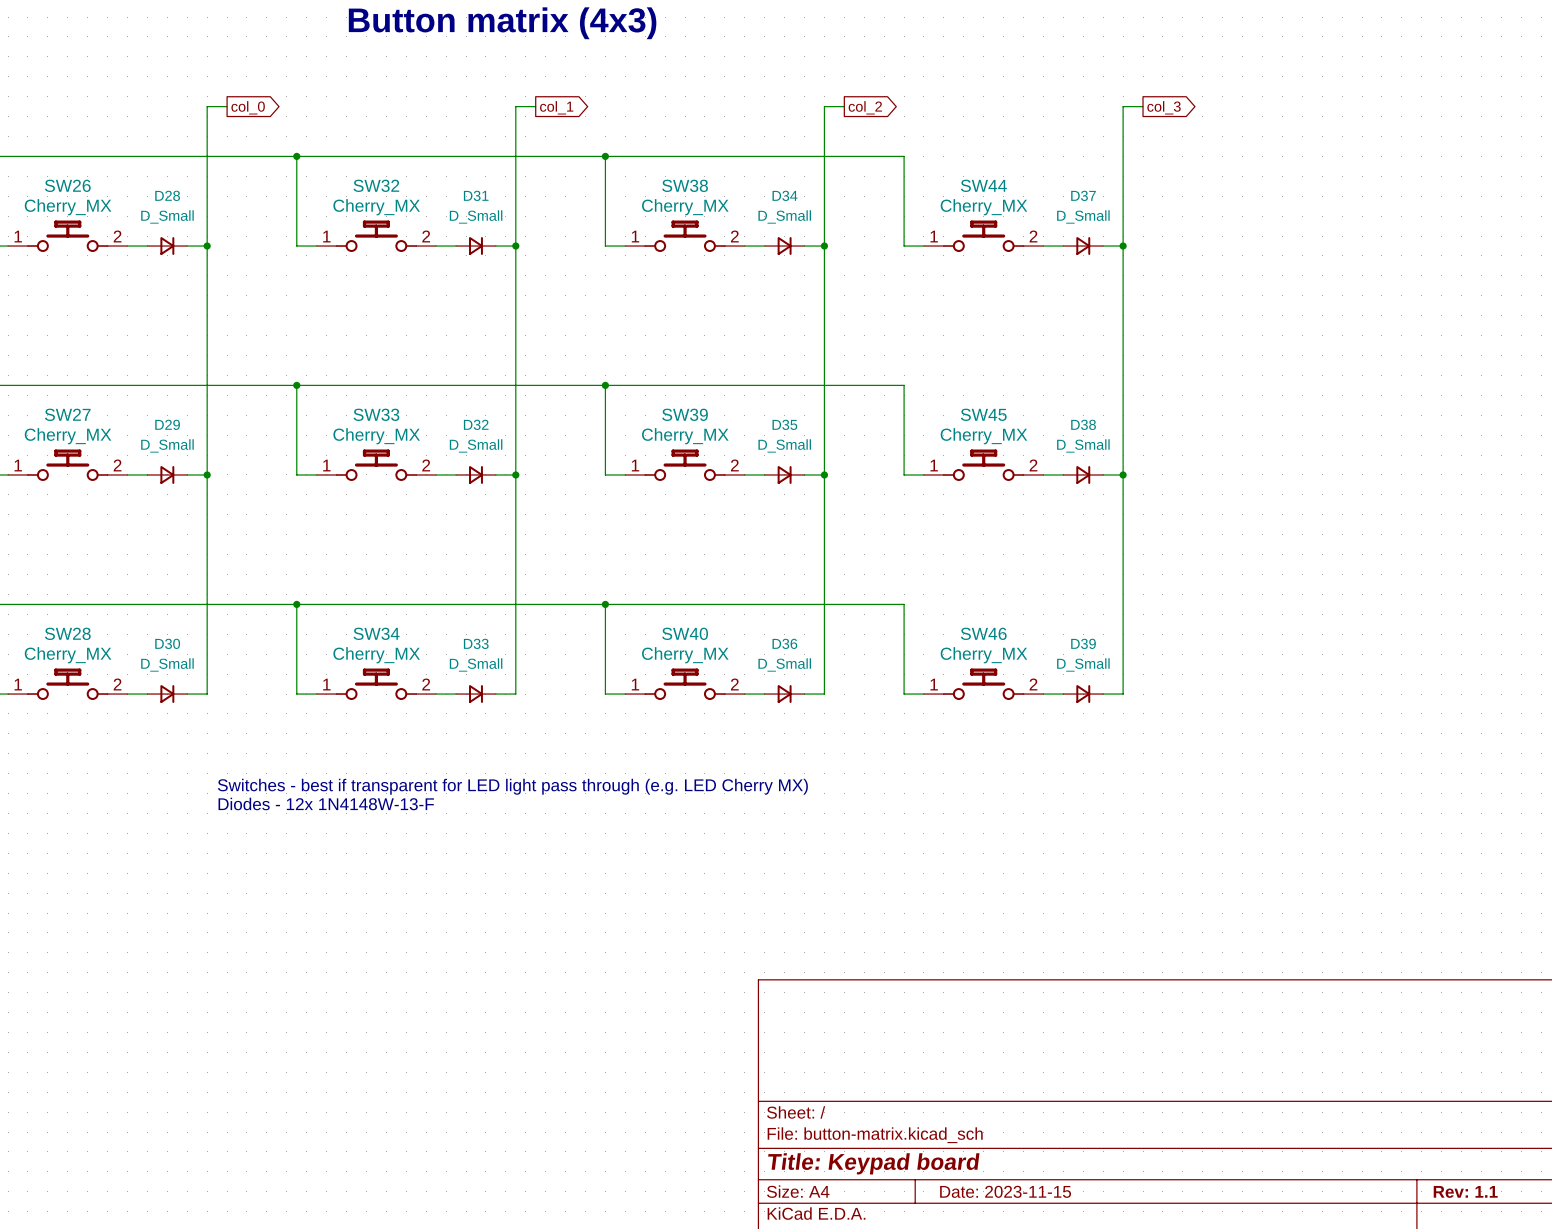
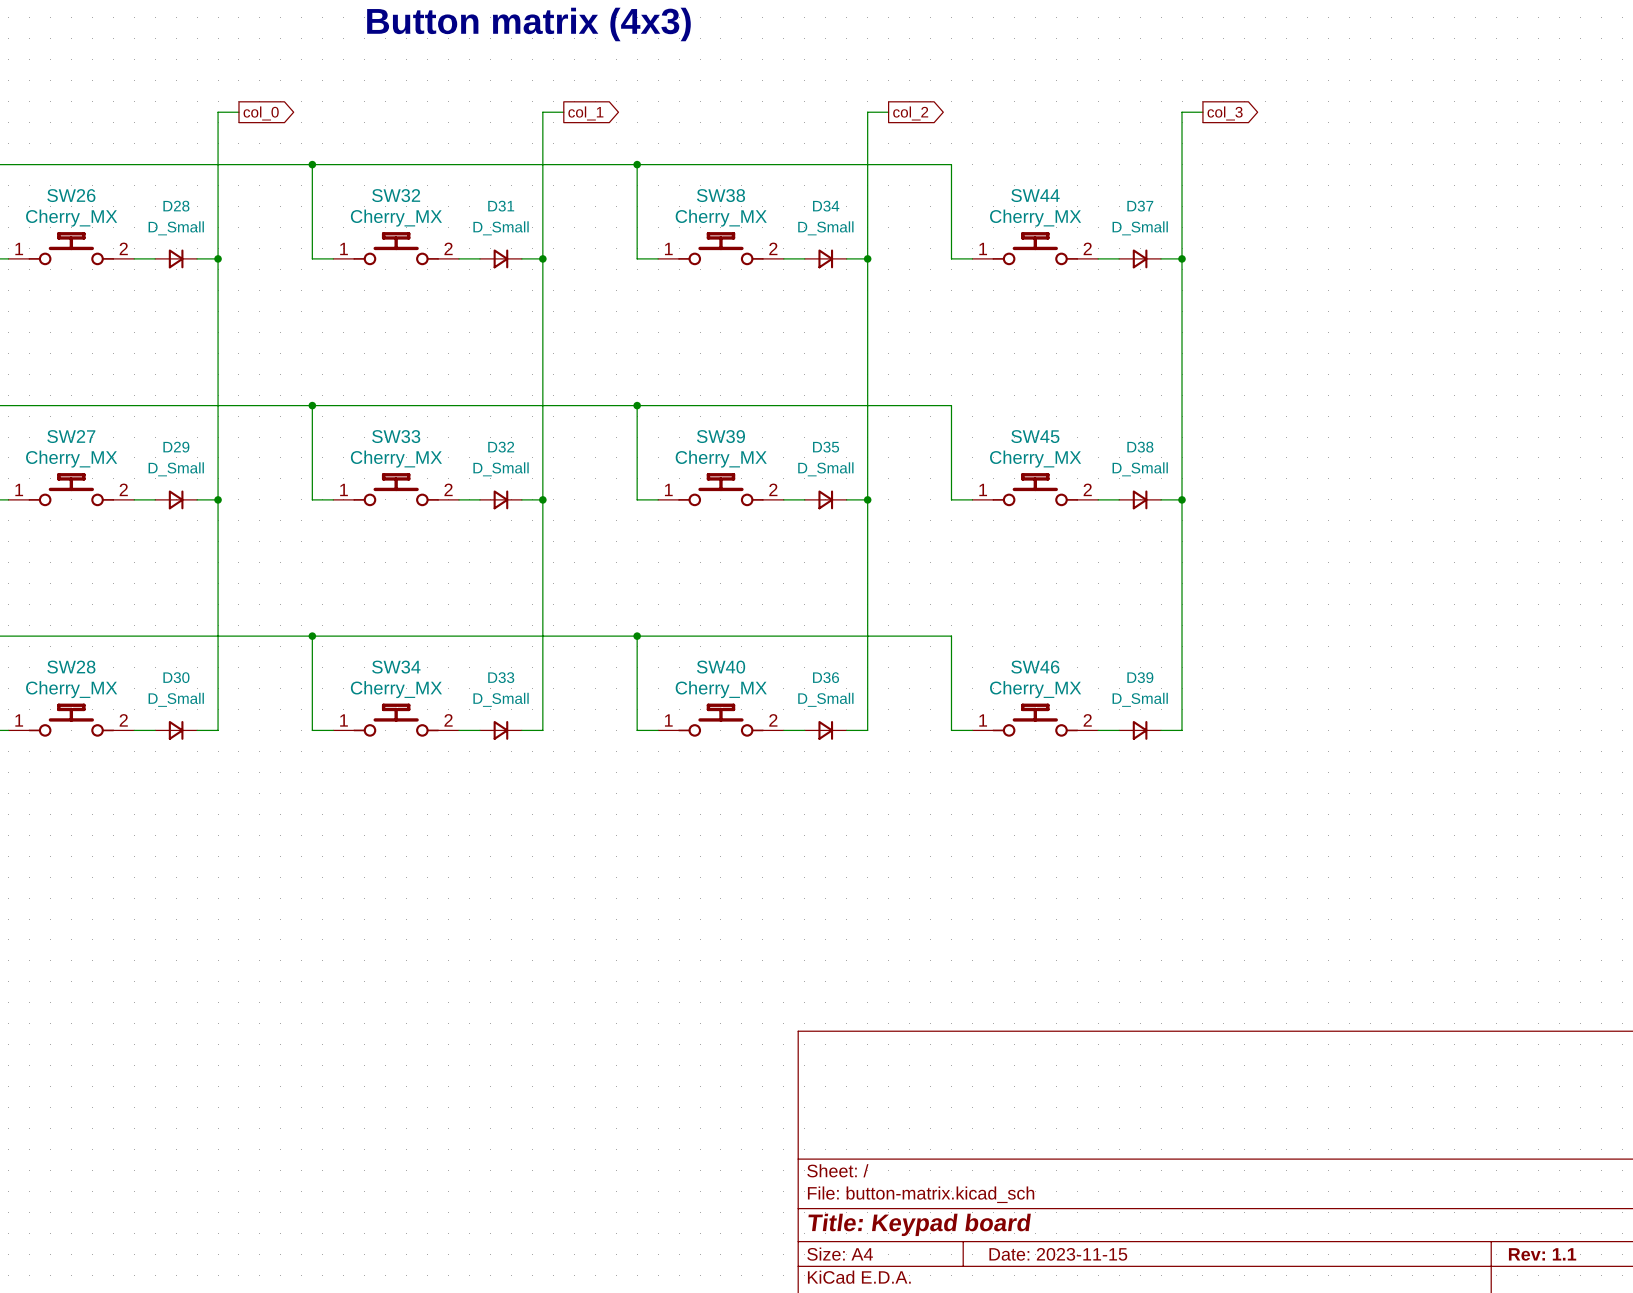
text: Switches - best if transparent for LED light pass through (e.g. LED Cherry MX) (512, 786) -> none
text: Diodes - 12x 1N4148W-13-F (326, 803) -> none

